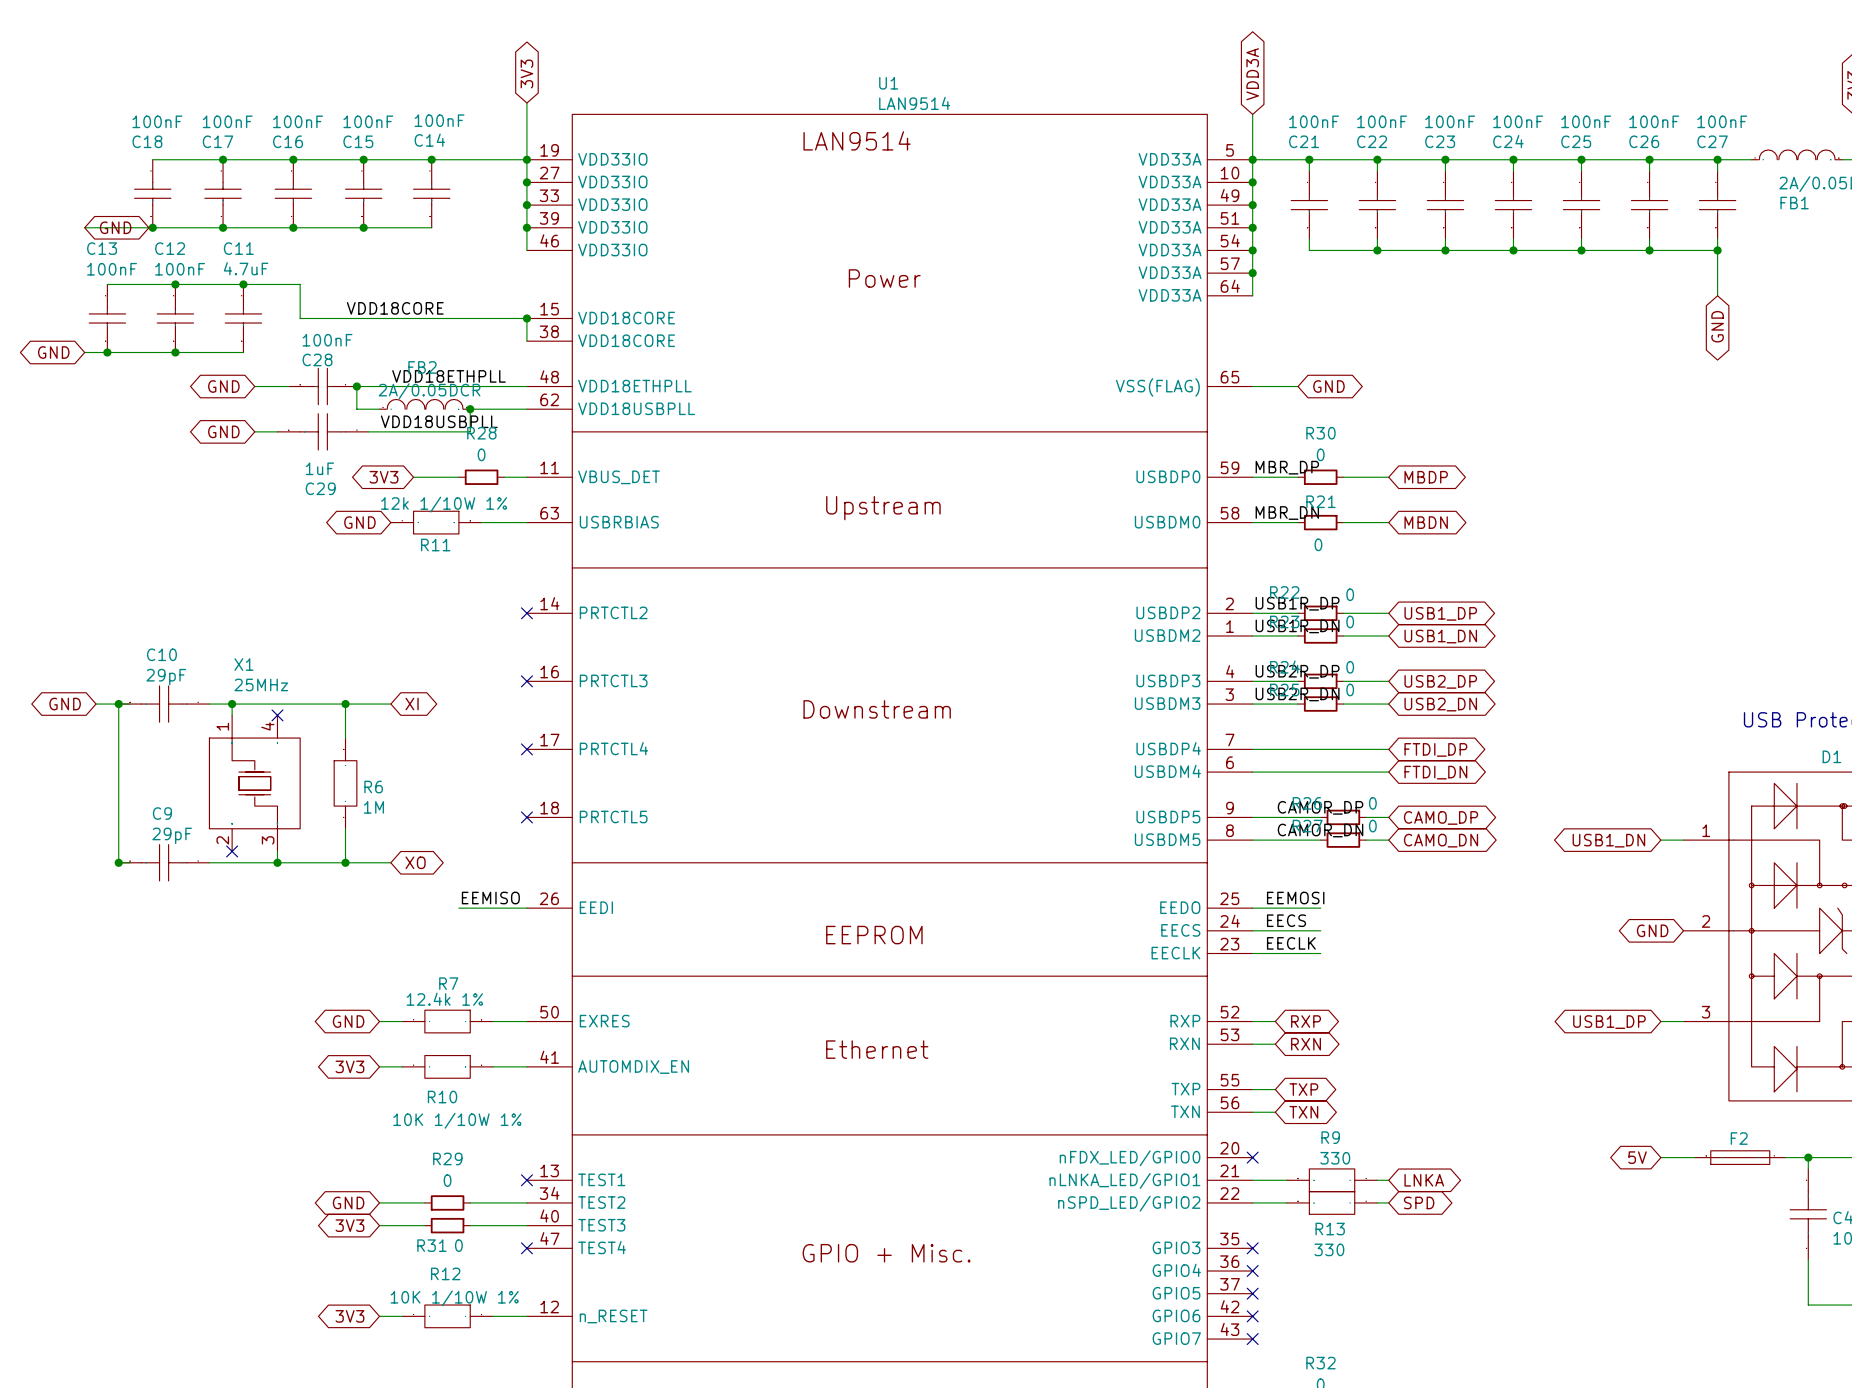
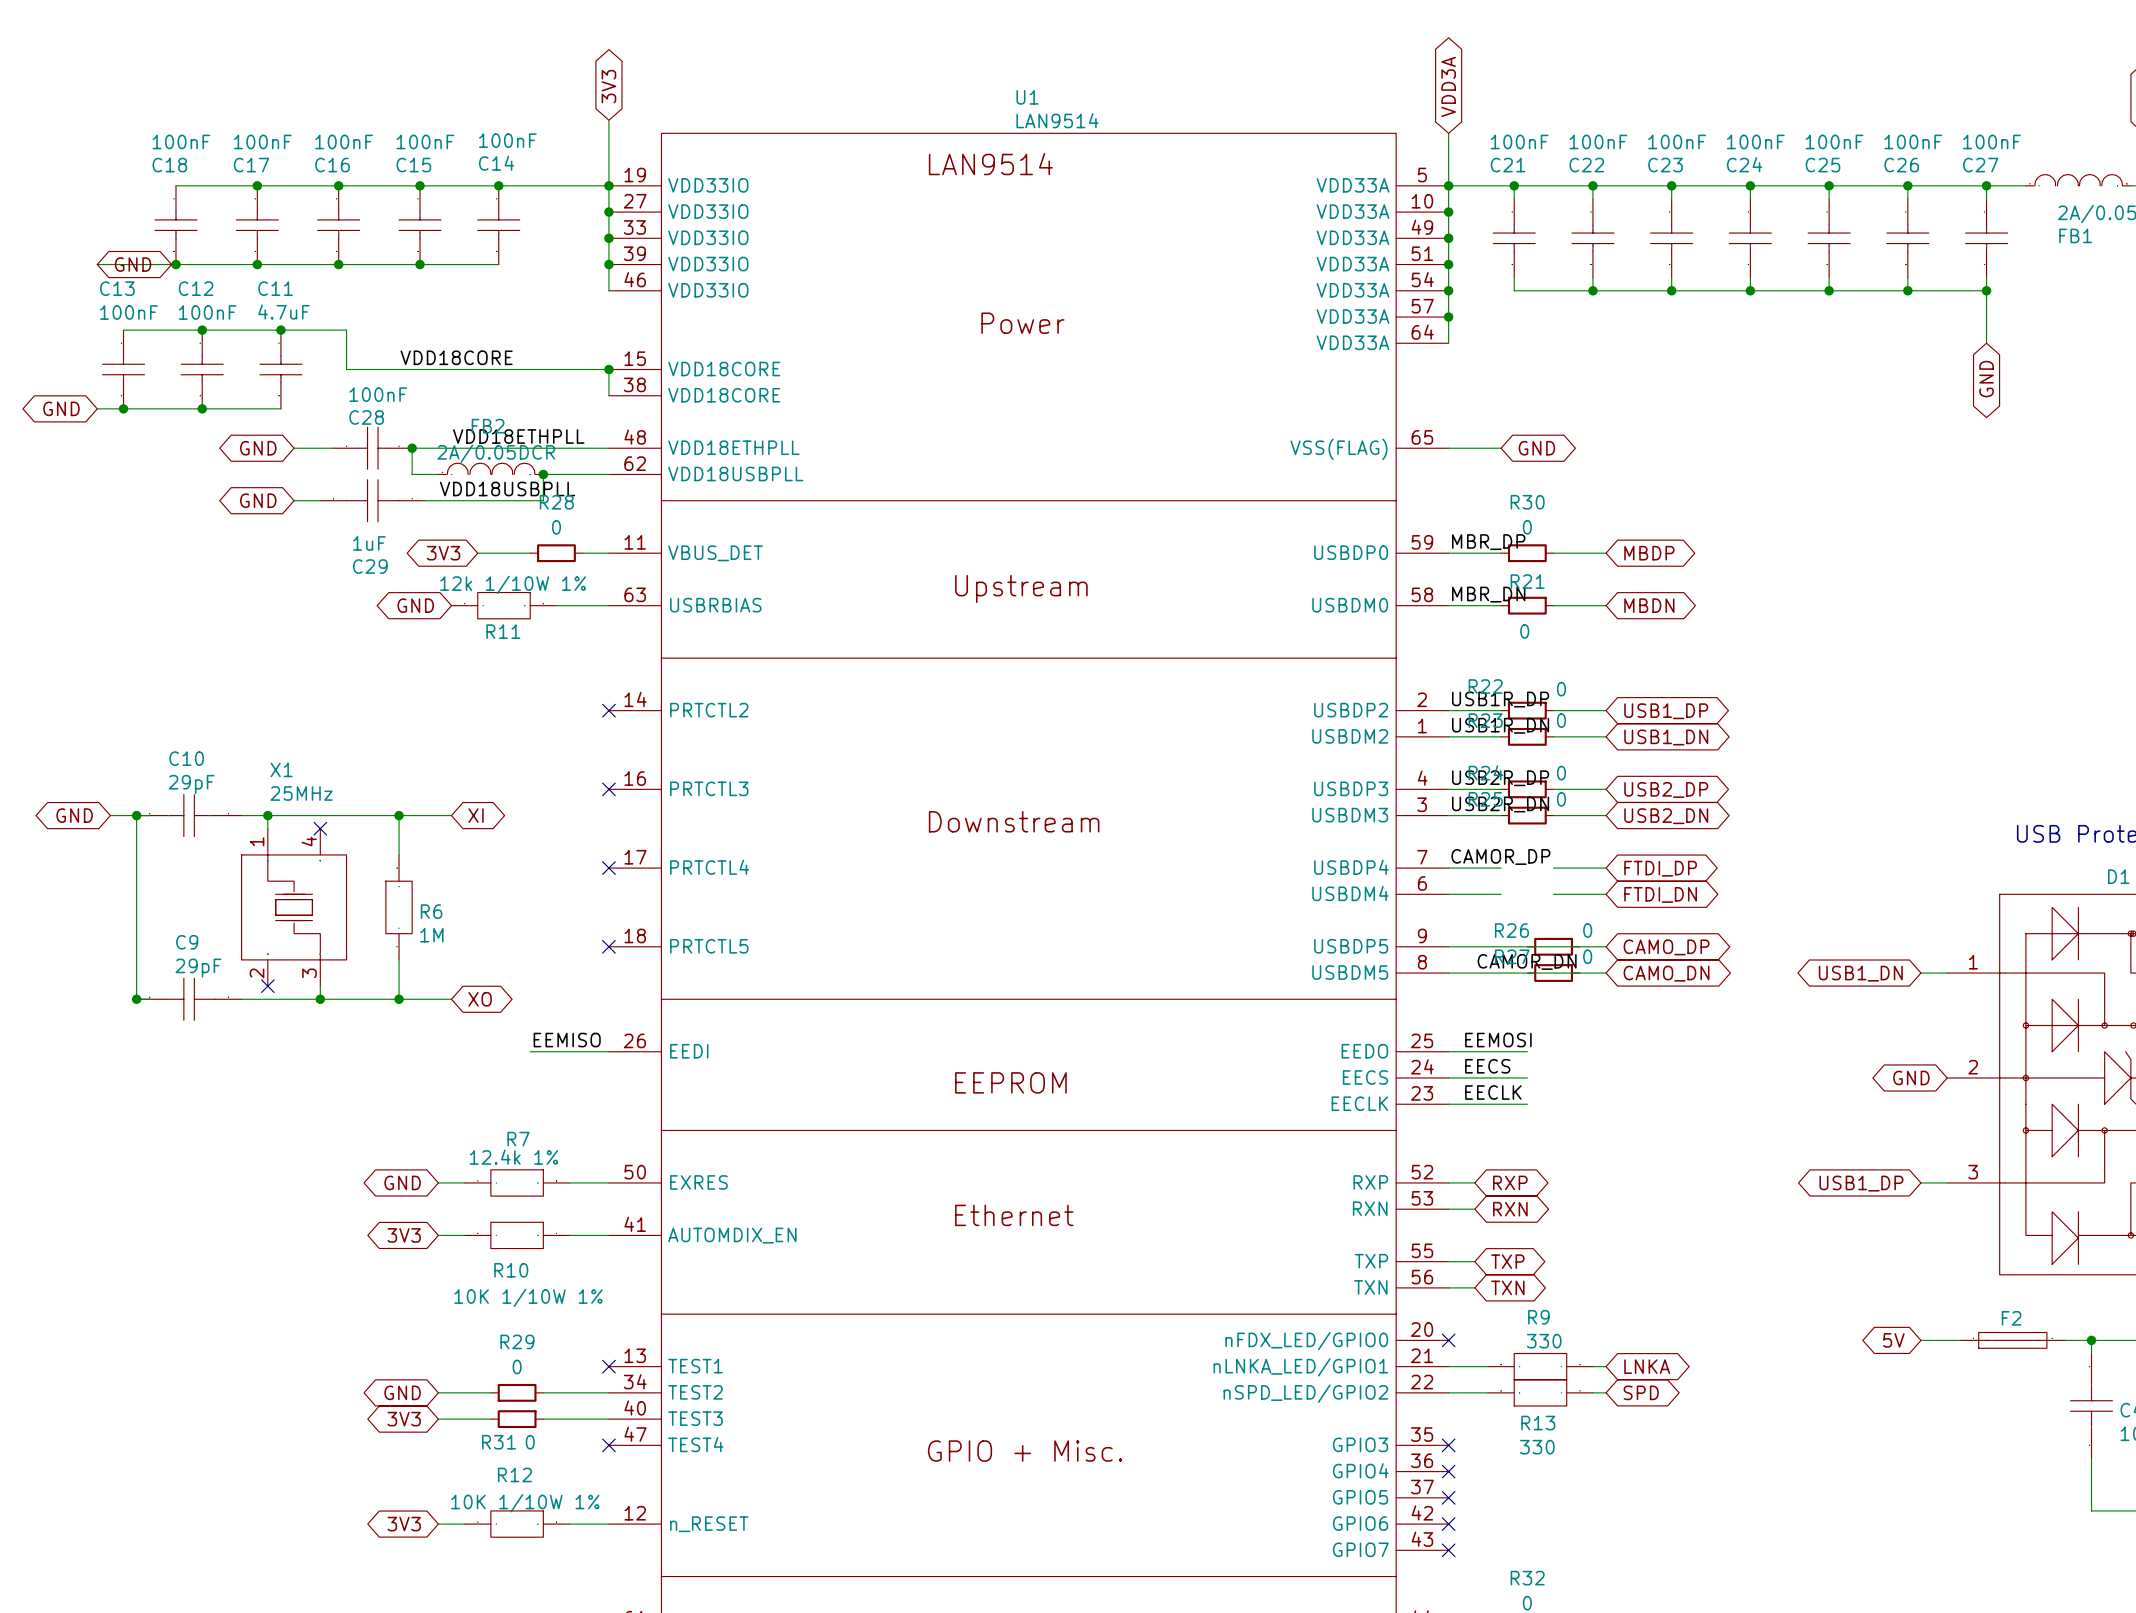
wire: (1298, 749) (1343, 749) -> (1527, 946) (1579, 946)
wire: (1298, 772) (1343, 772) -> (1527, 973) (1579, 973)
label position: CAMOR_DP (1320, 807) -> CAMOR_DP (1500, 856)

